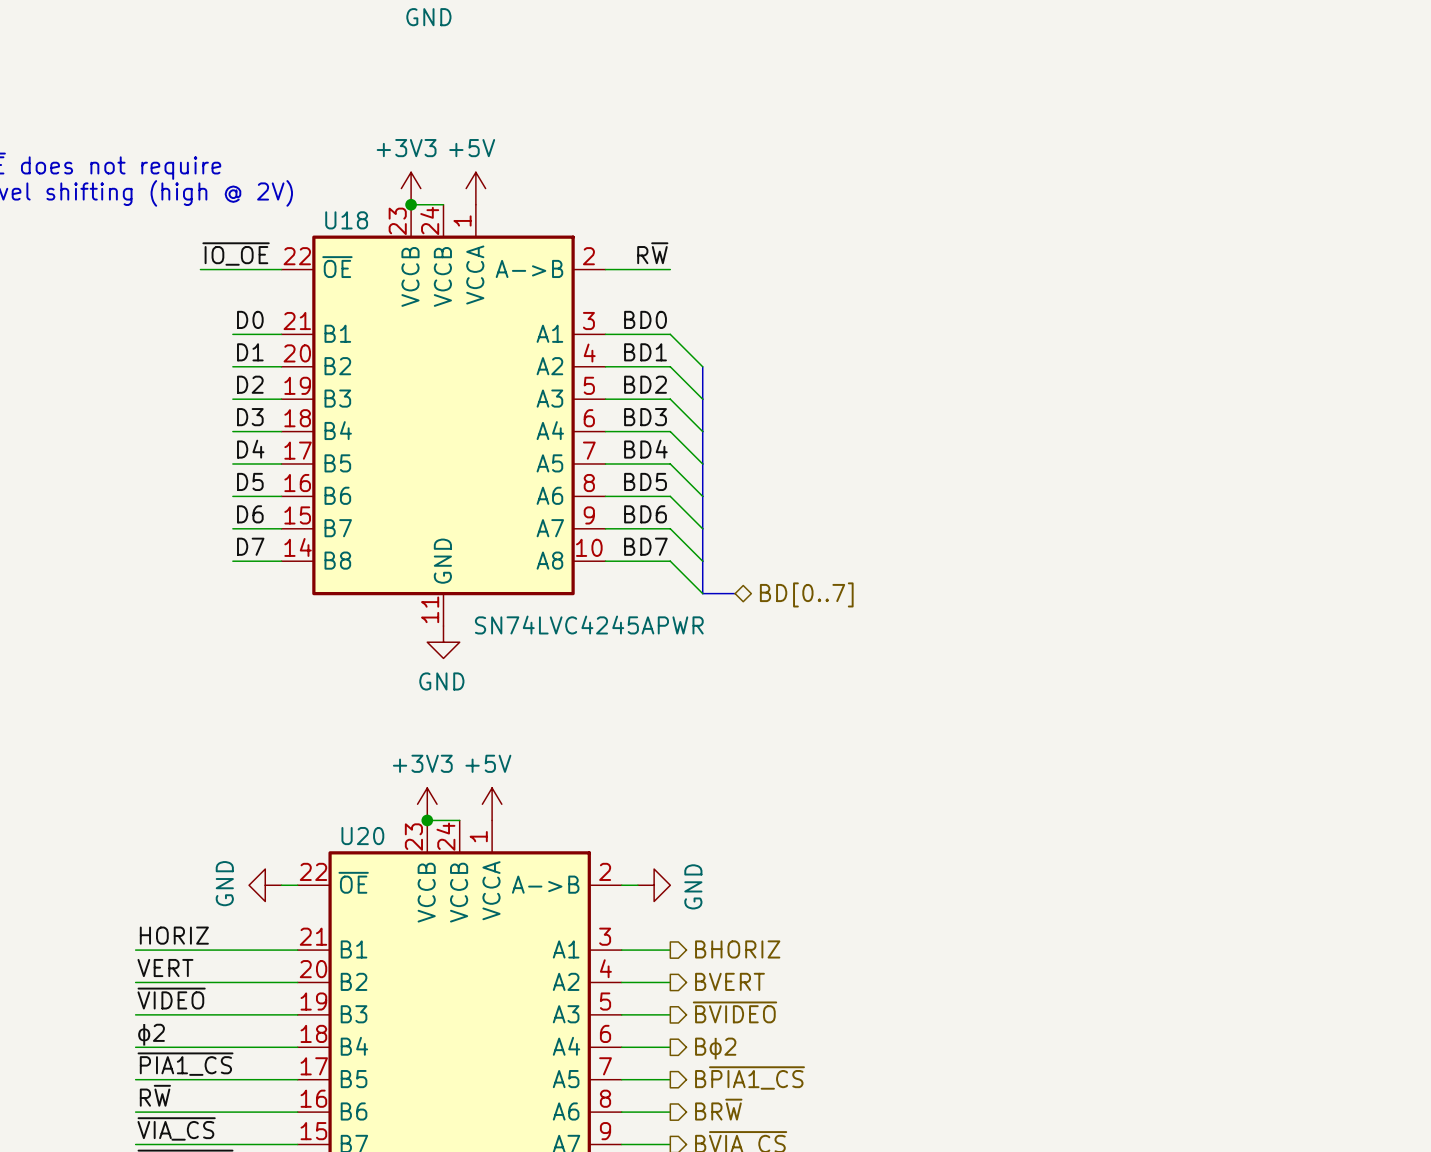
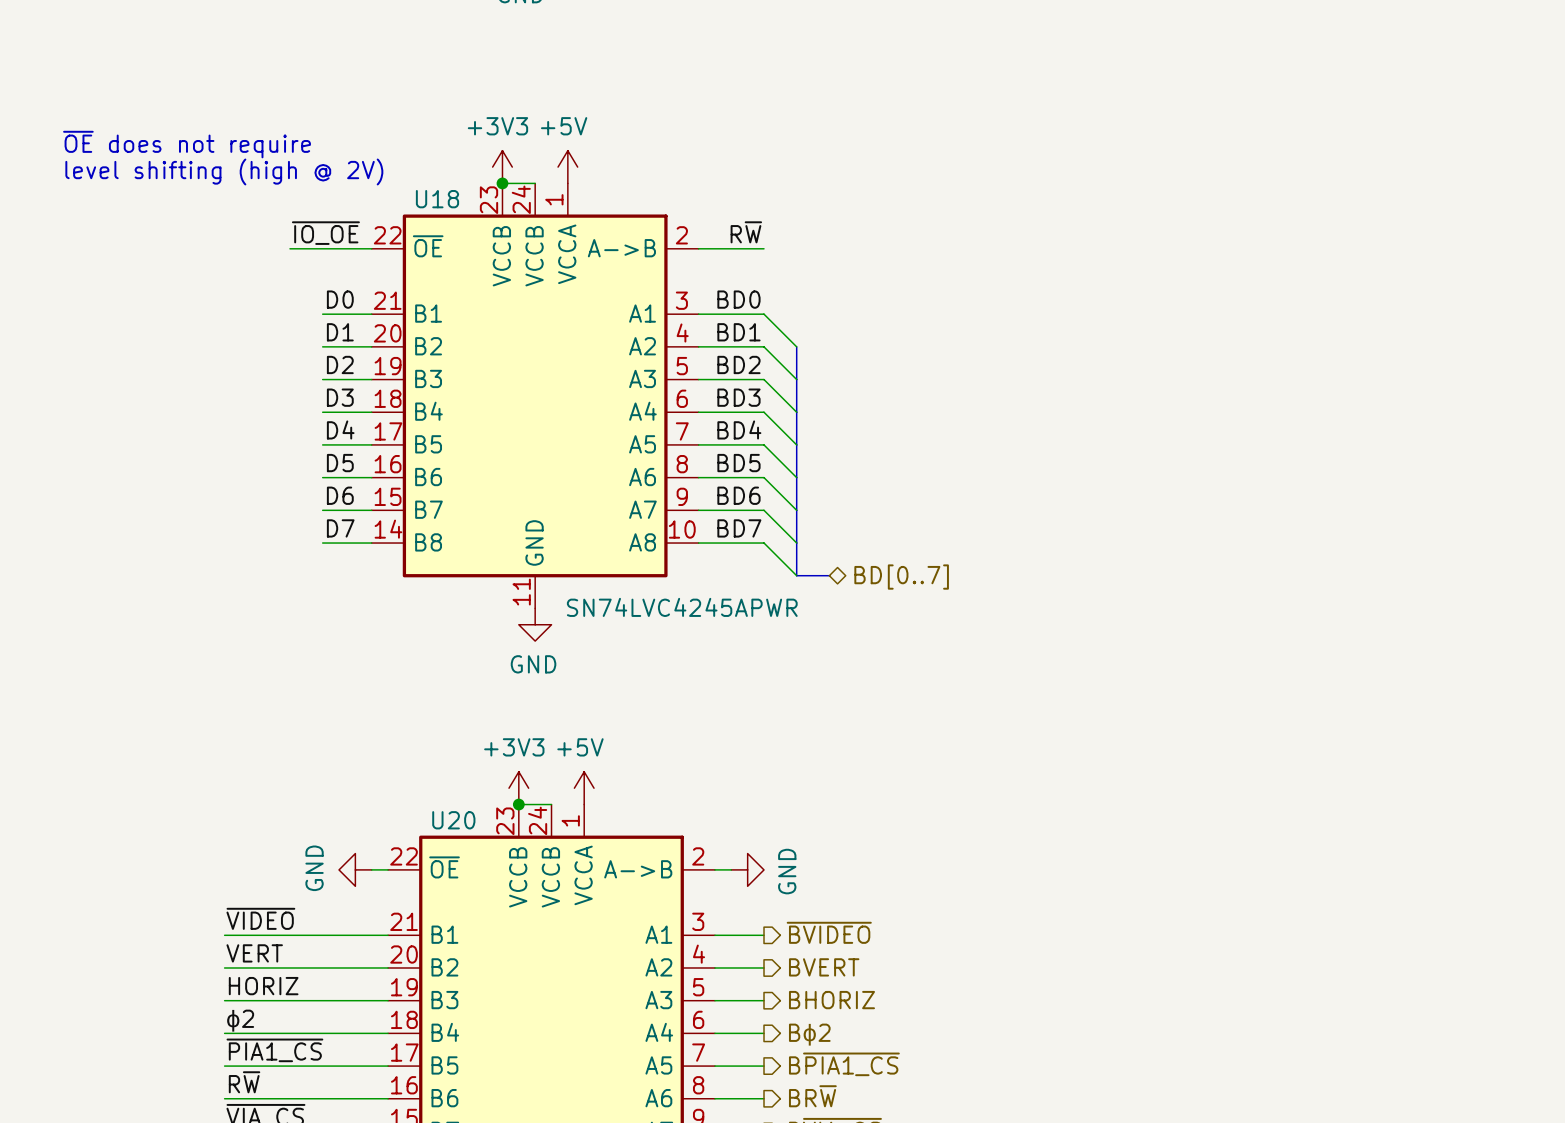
label: HORIZ (174, 935) -> ~{VIDEO} (260, 918)
hierarchical label: BHORIZ (737, 949) -> ~{BVIDEO} (829, 932)
label: ~{VIDEO} (171, 998) -> HORIZ (263, 986)
hierarchical label: ~{BVIDEO} (735, 1012) -> BHORIZ (831, 1000)

